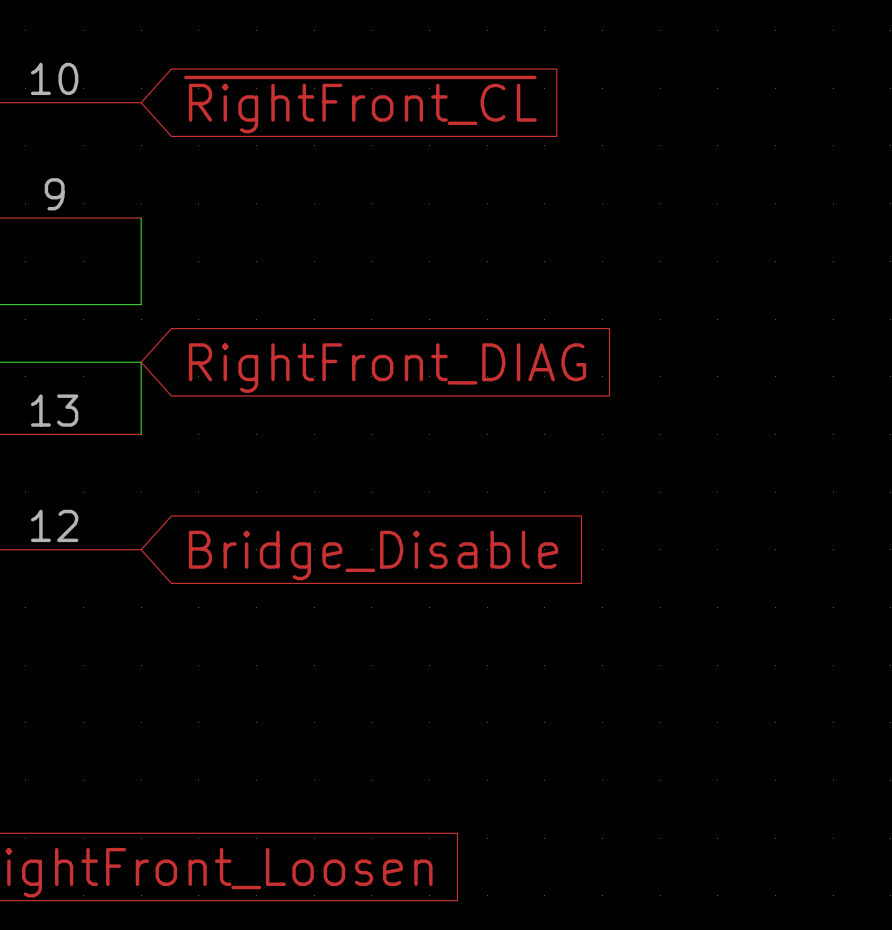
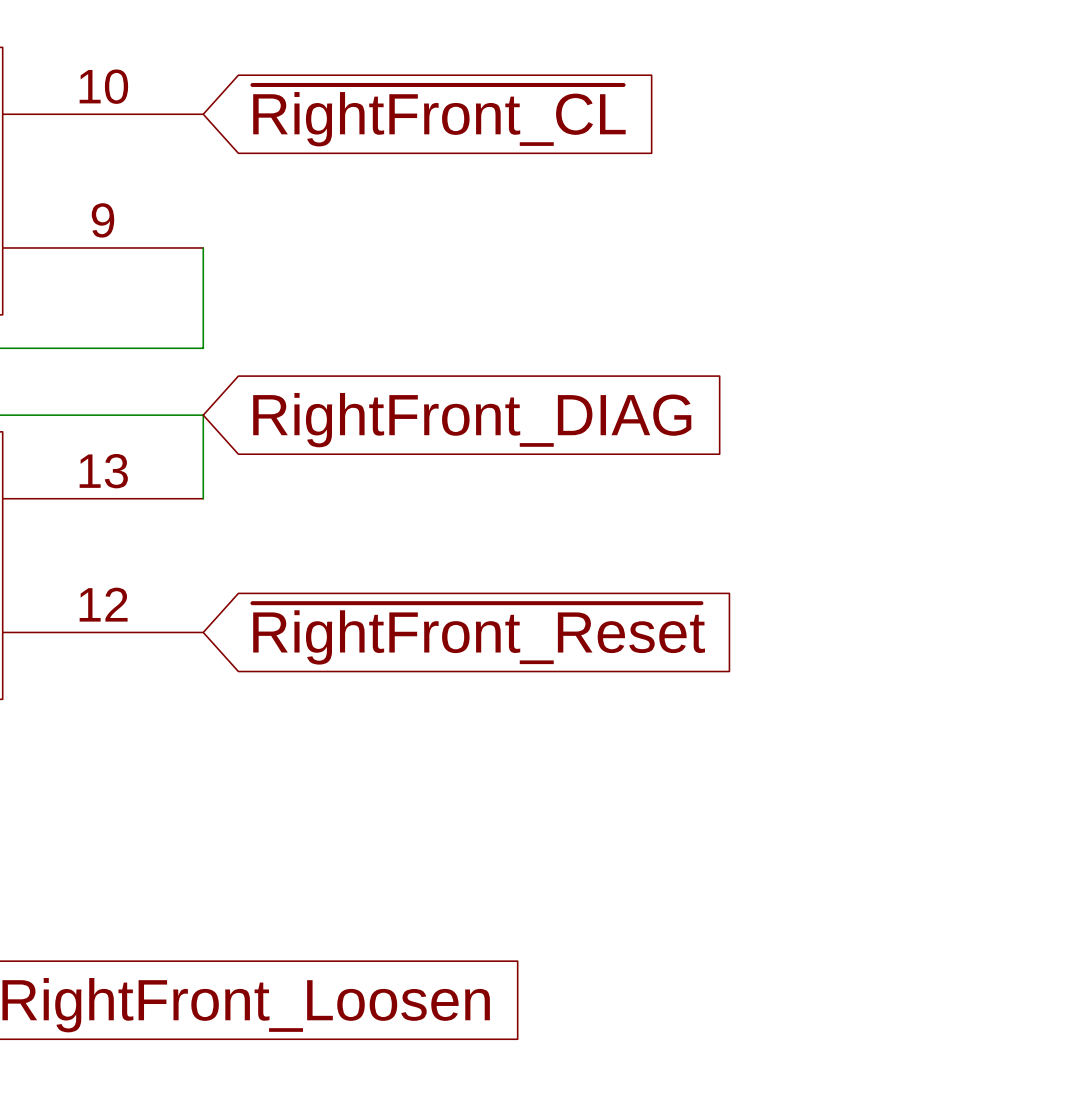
global label: Bridge_Disable (373, 555) -> ~{RightFront_Reset} (478, 633)

